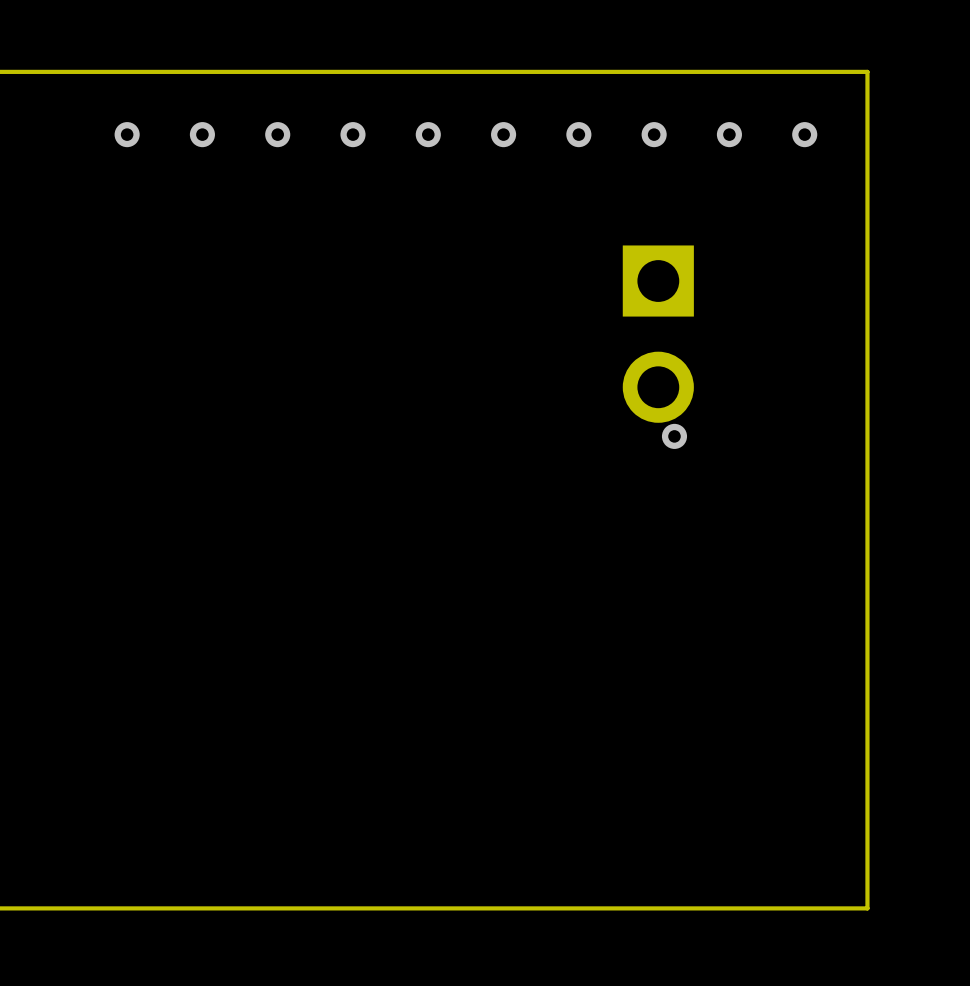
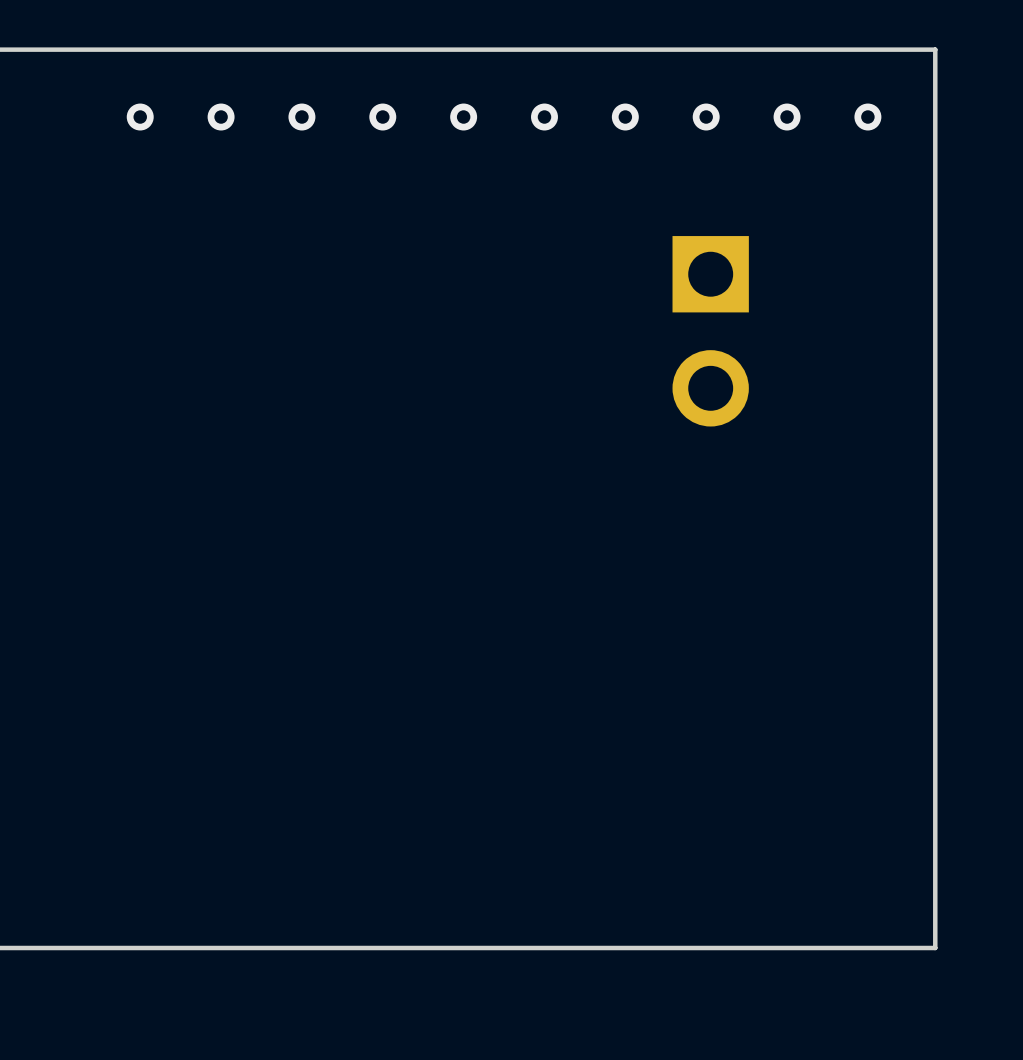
via: (674, 436) -> none

